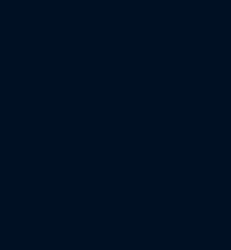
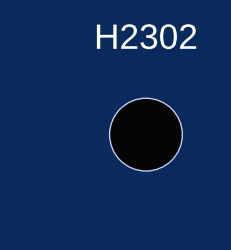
H2302: none -> (145, 134)

